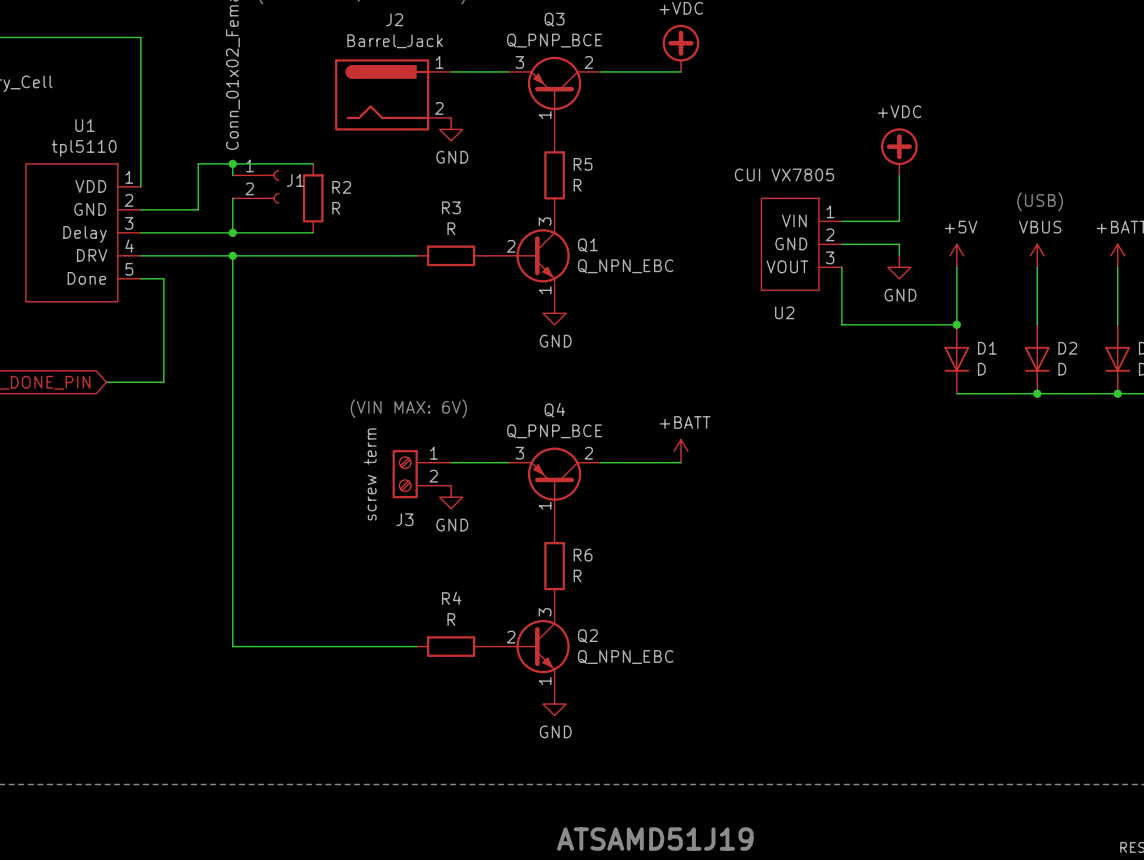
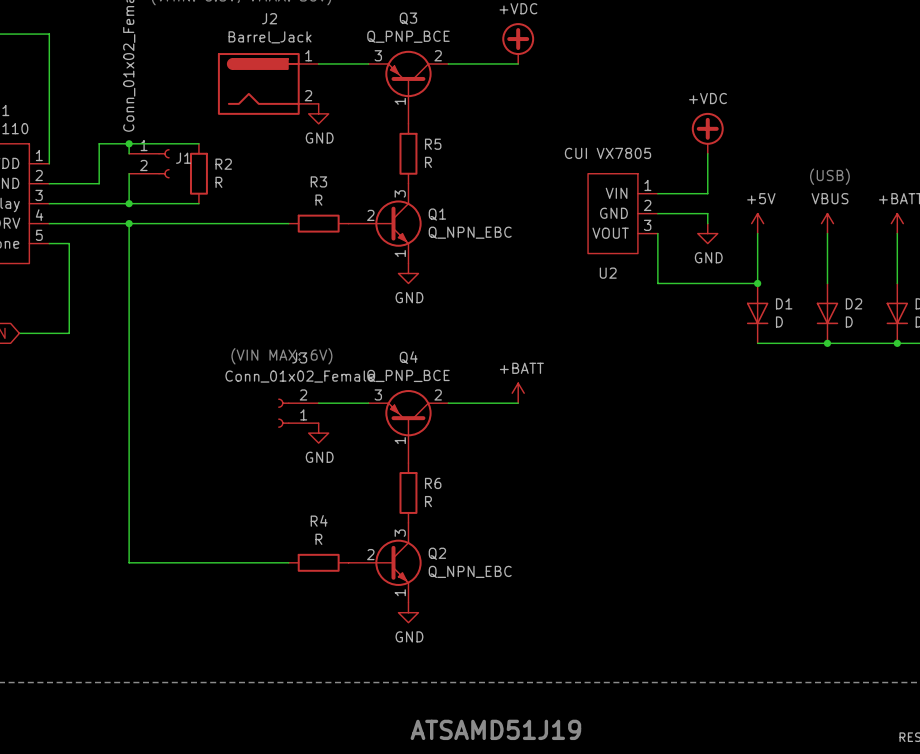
J3 symbol: [392, 450, 452, 499] -> [278, 398, 319, 428]
J3 value: screw term (370, 474) -> Conn_01x02_Female (299, 376)
J3 name position: J3 (404, 519) -> J3 (299, 357)

